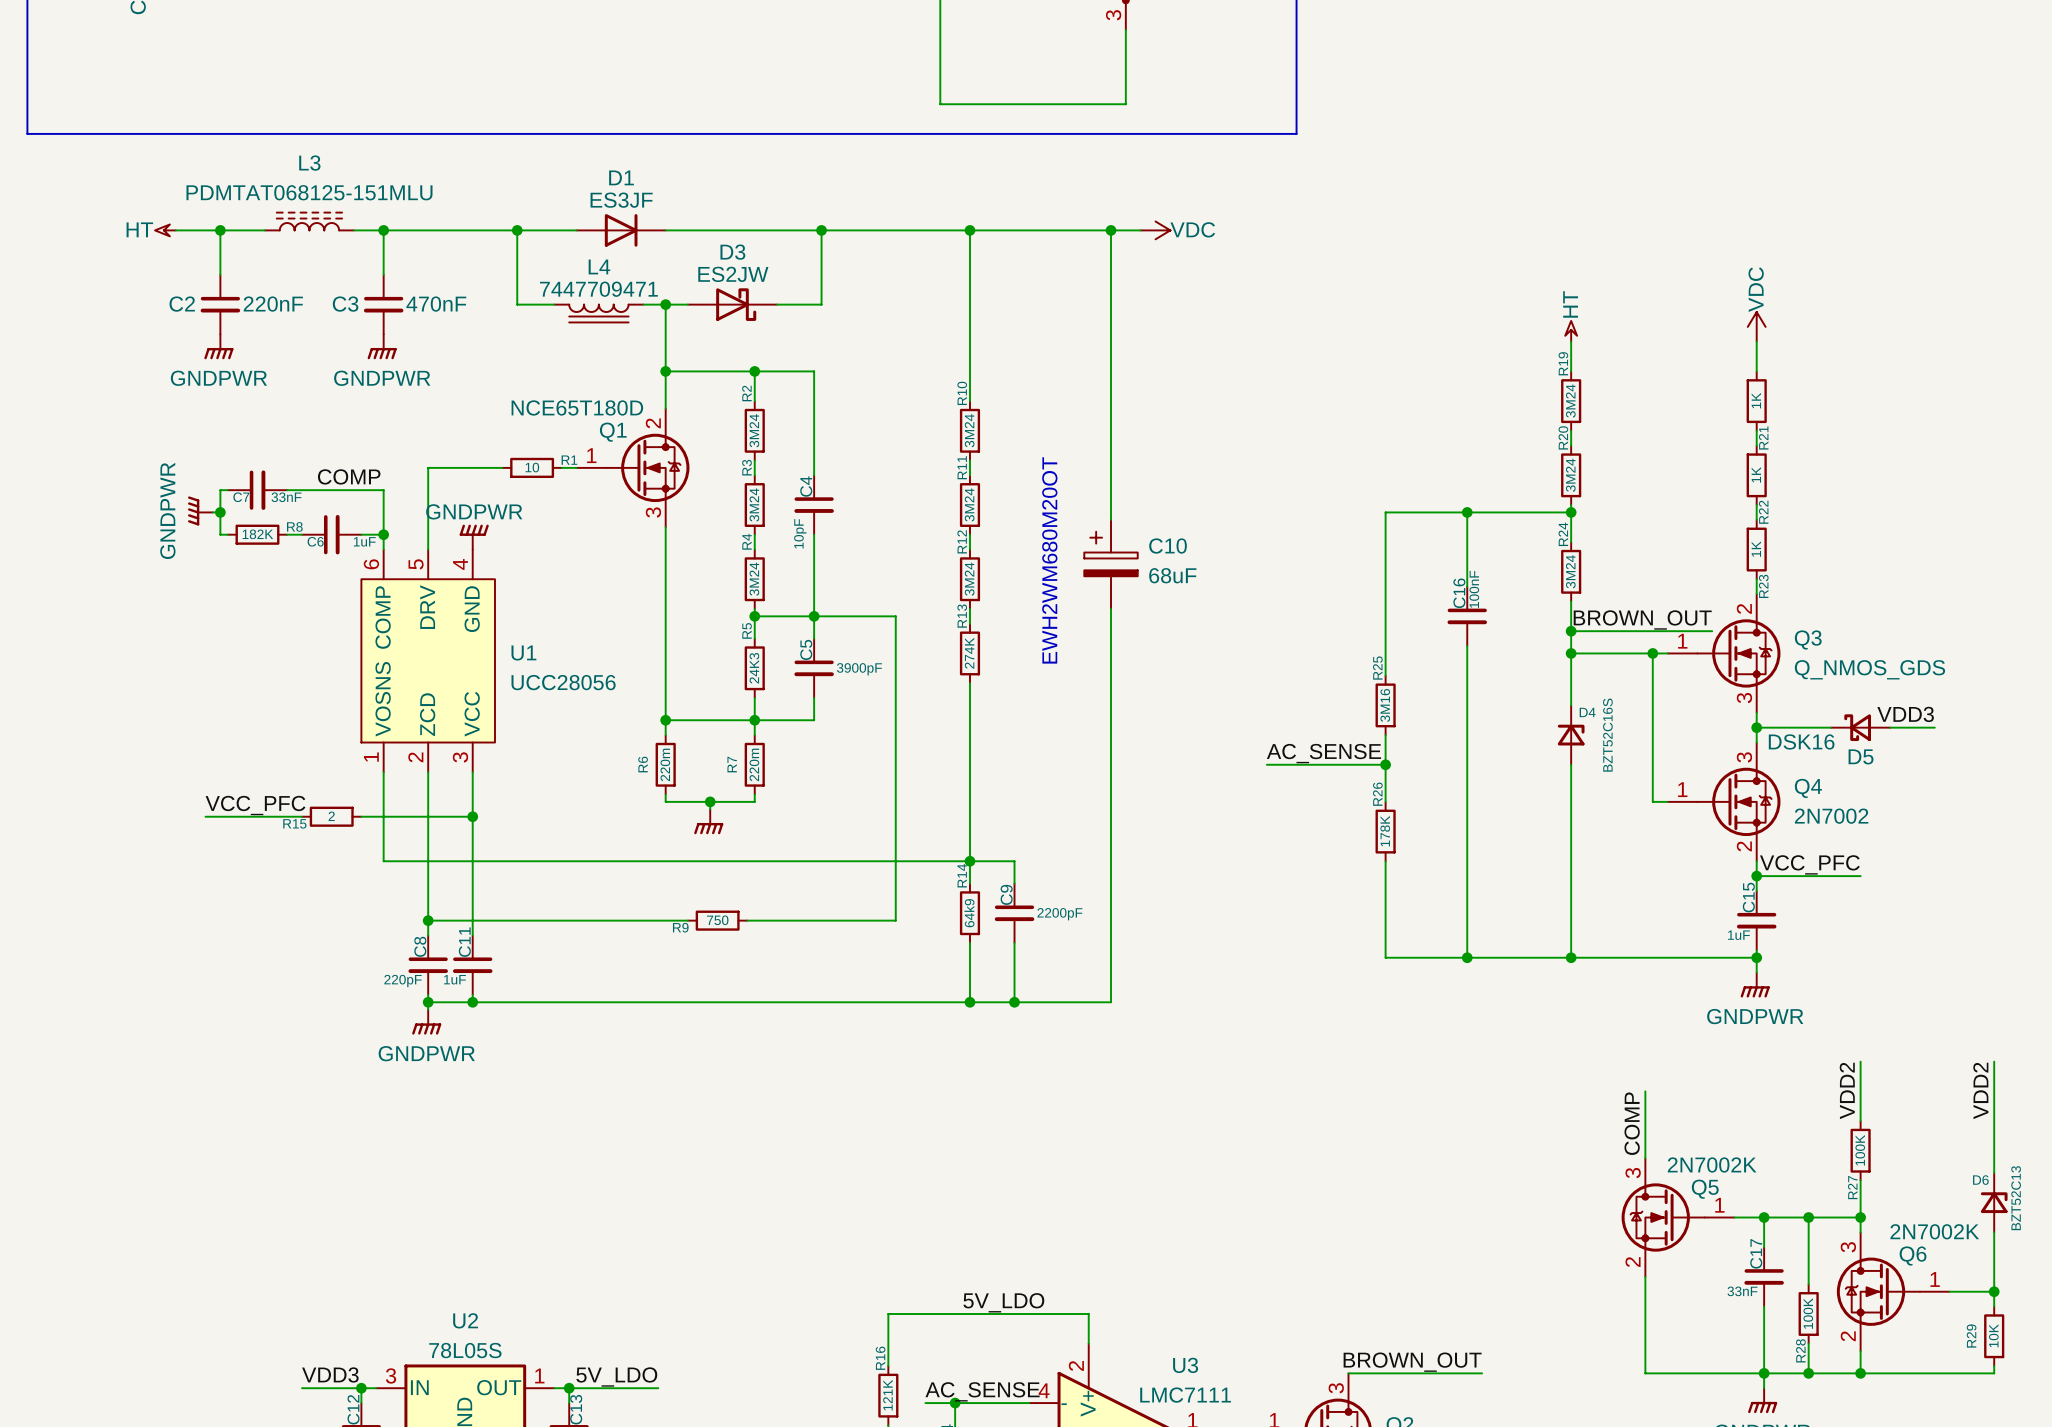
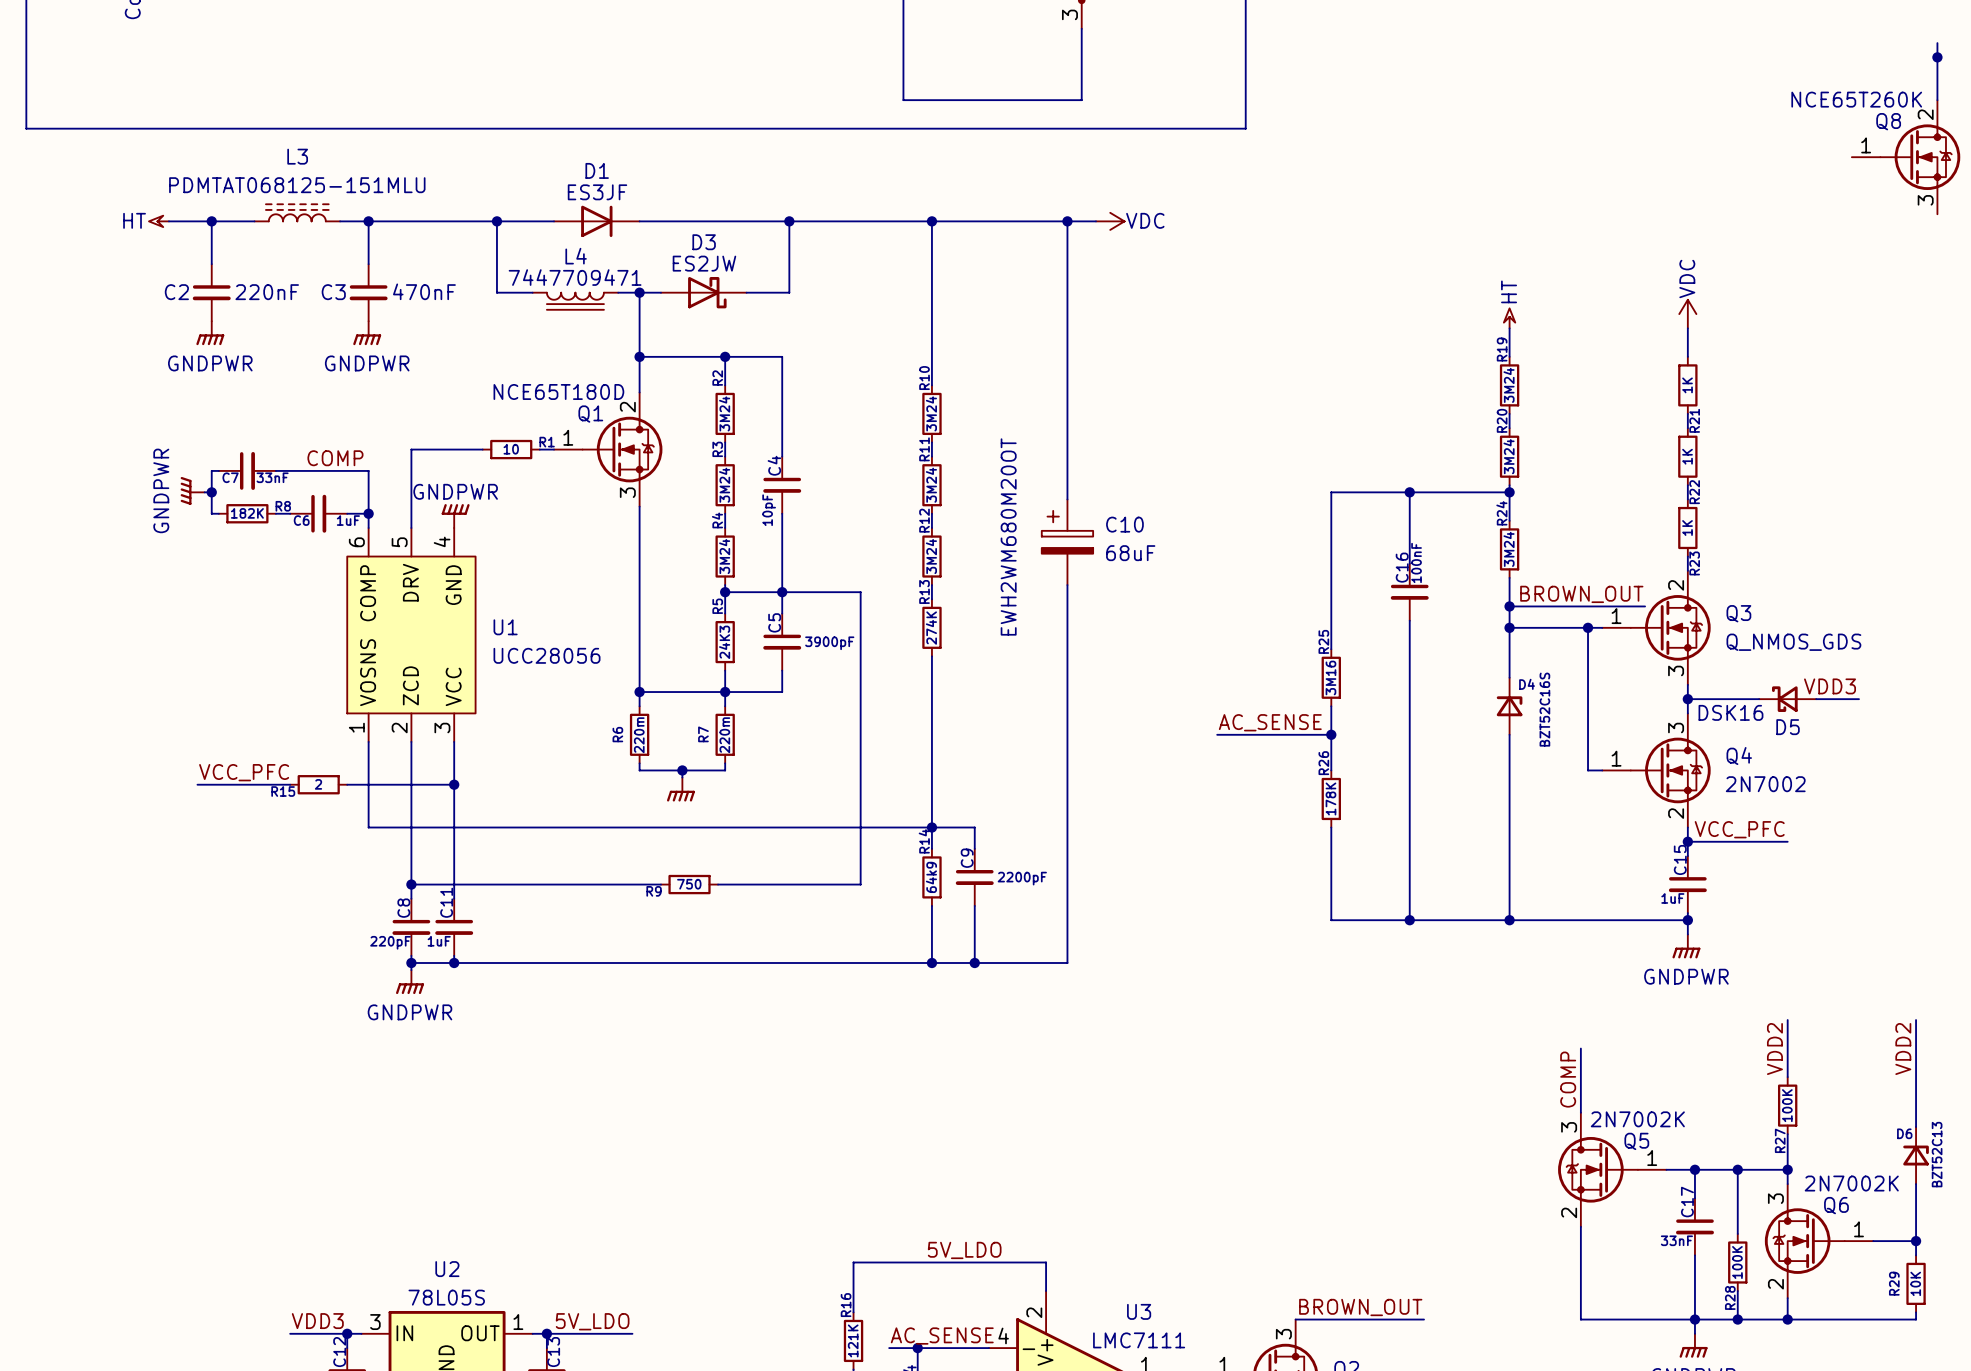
wire: none -> (1937, 43) (1937, 100)
junction: none -> (1937, 57)
Q8: none -> NCE65T260K (1906, 157)

